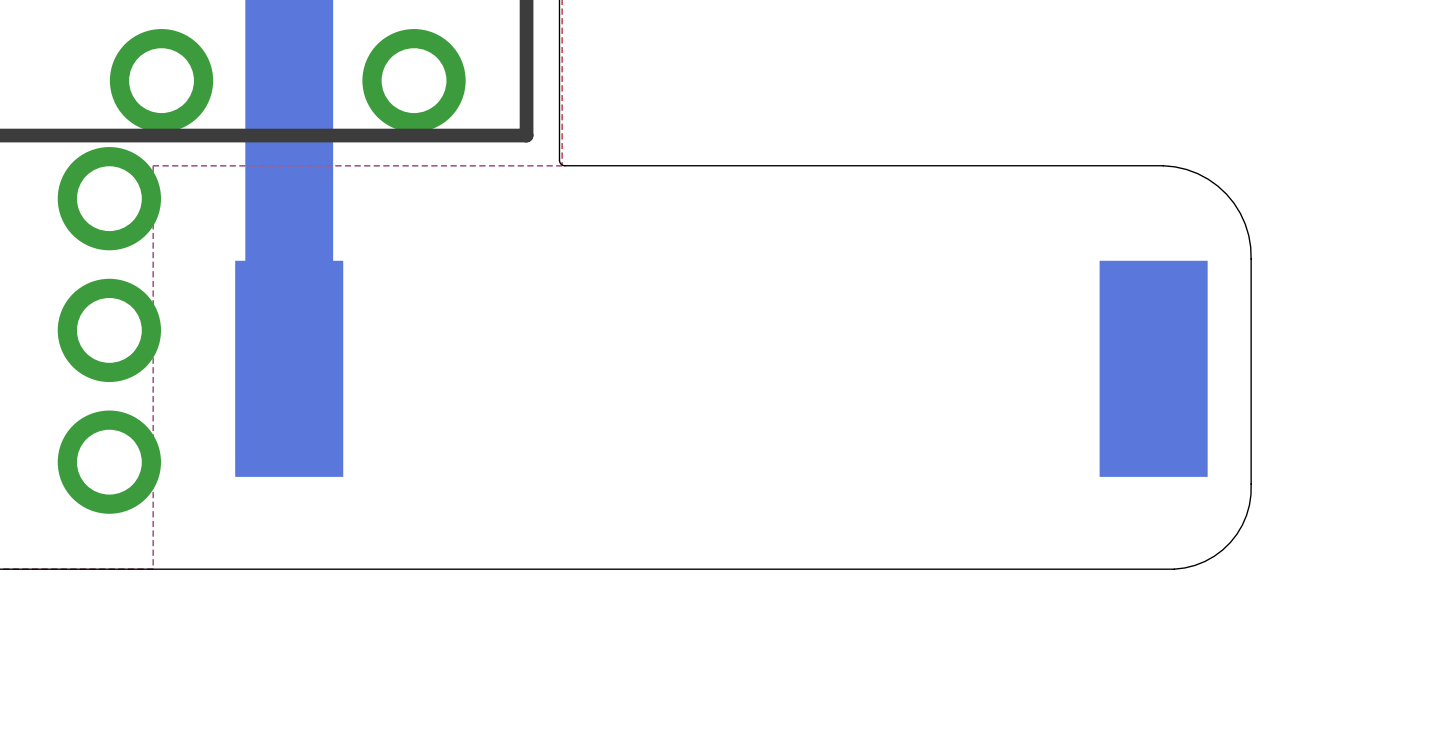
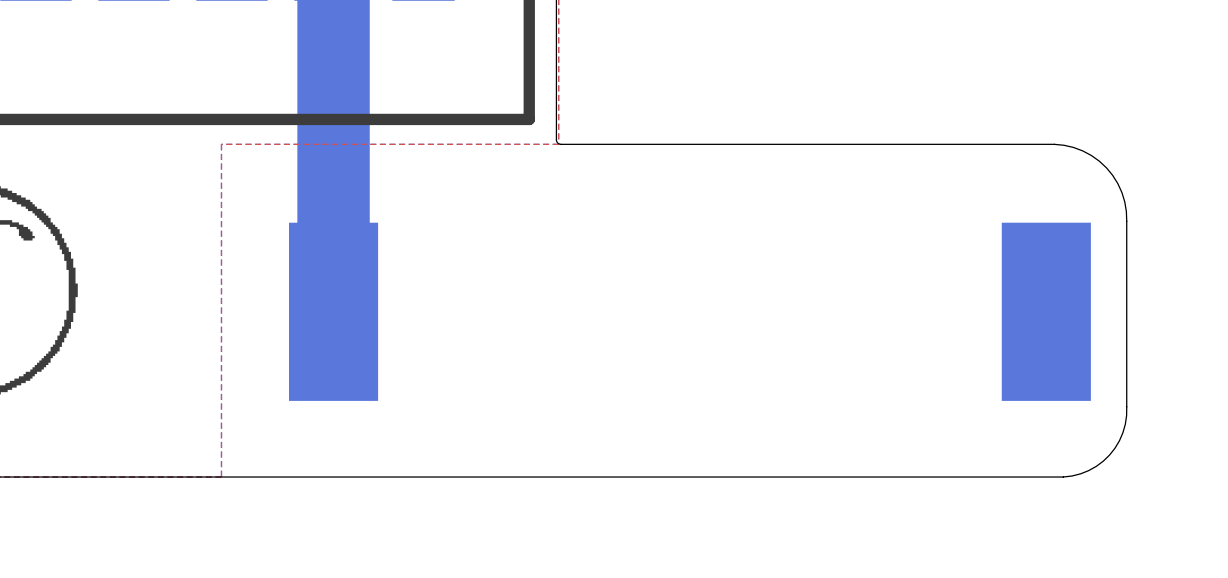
via: (161, 80) -> none
via: (414, 80) -> none
via: (109, 198) -> none
via: (109, 330) -> none
via: (109, 462) -> none

